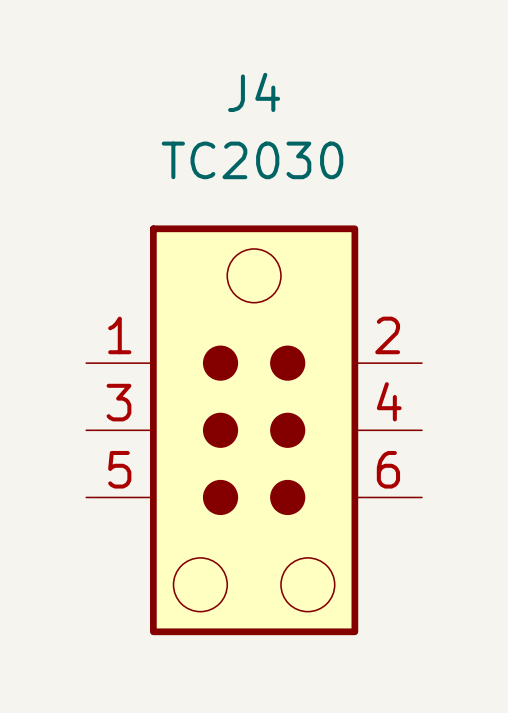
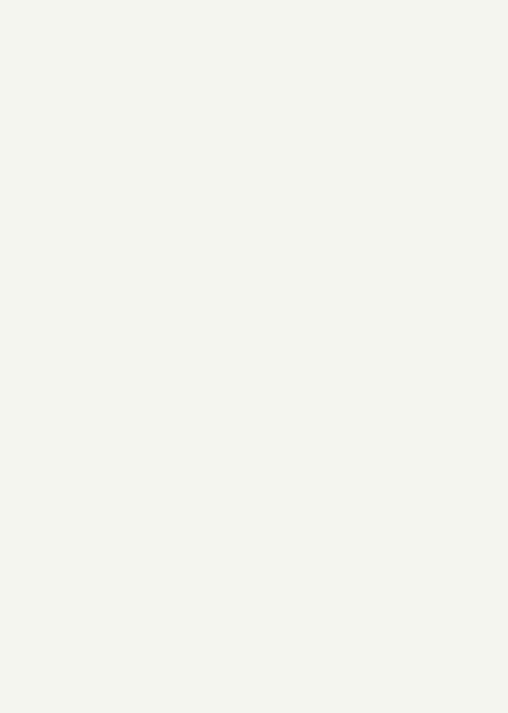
J4: TC2030 (254, 430) -> none

